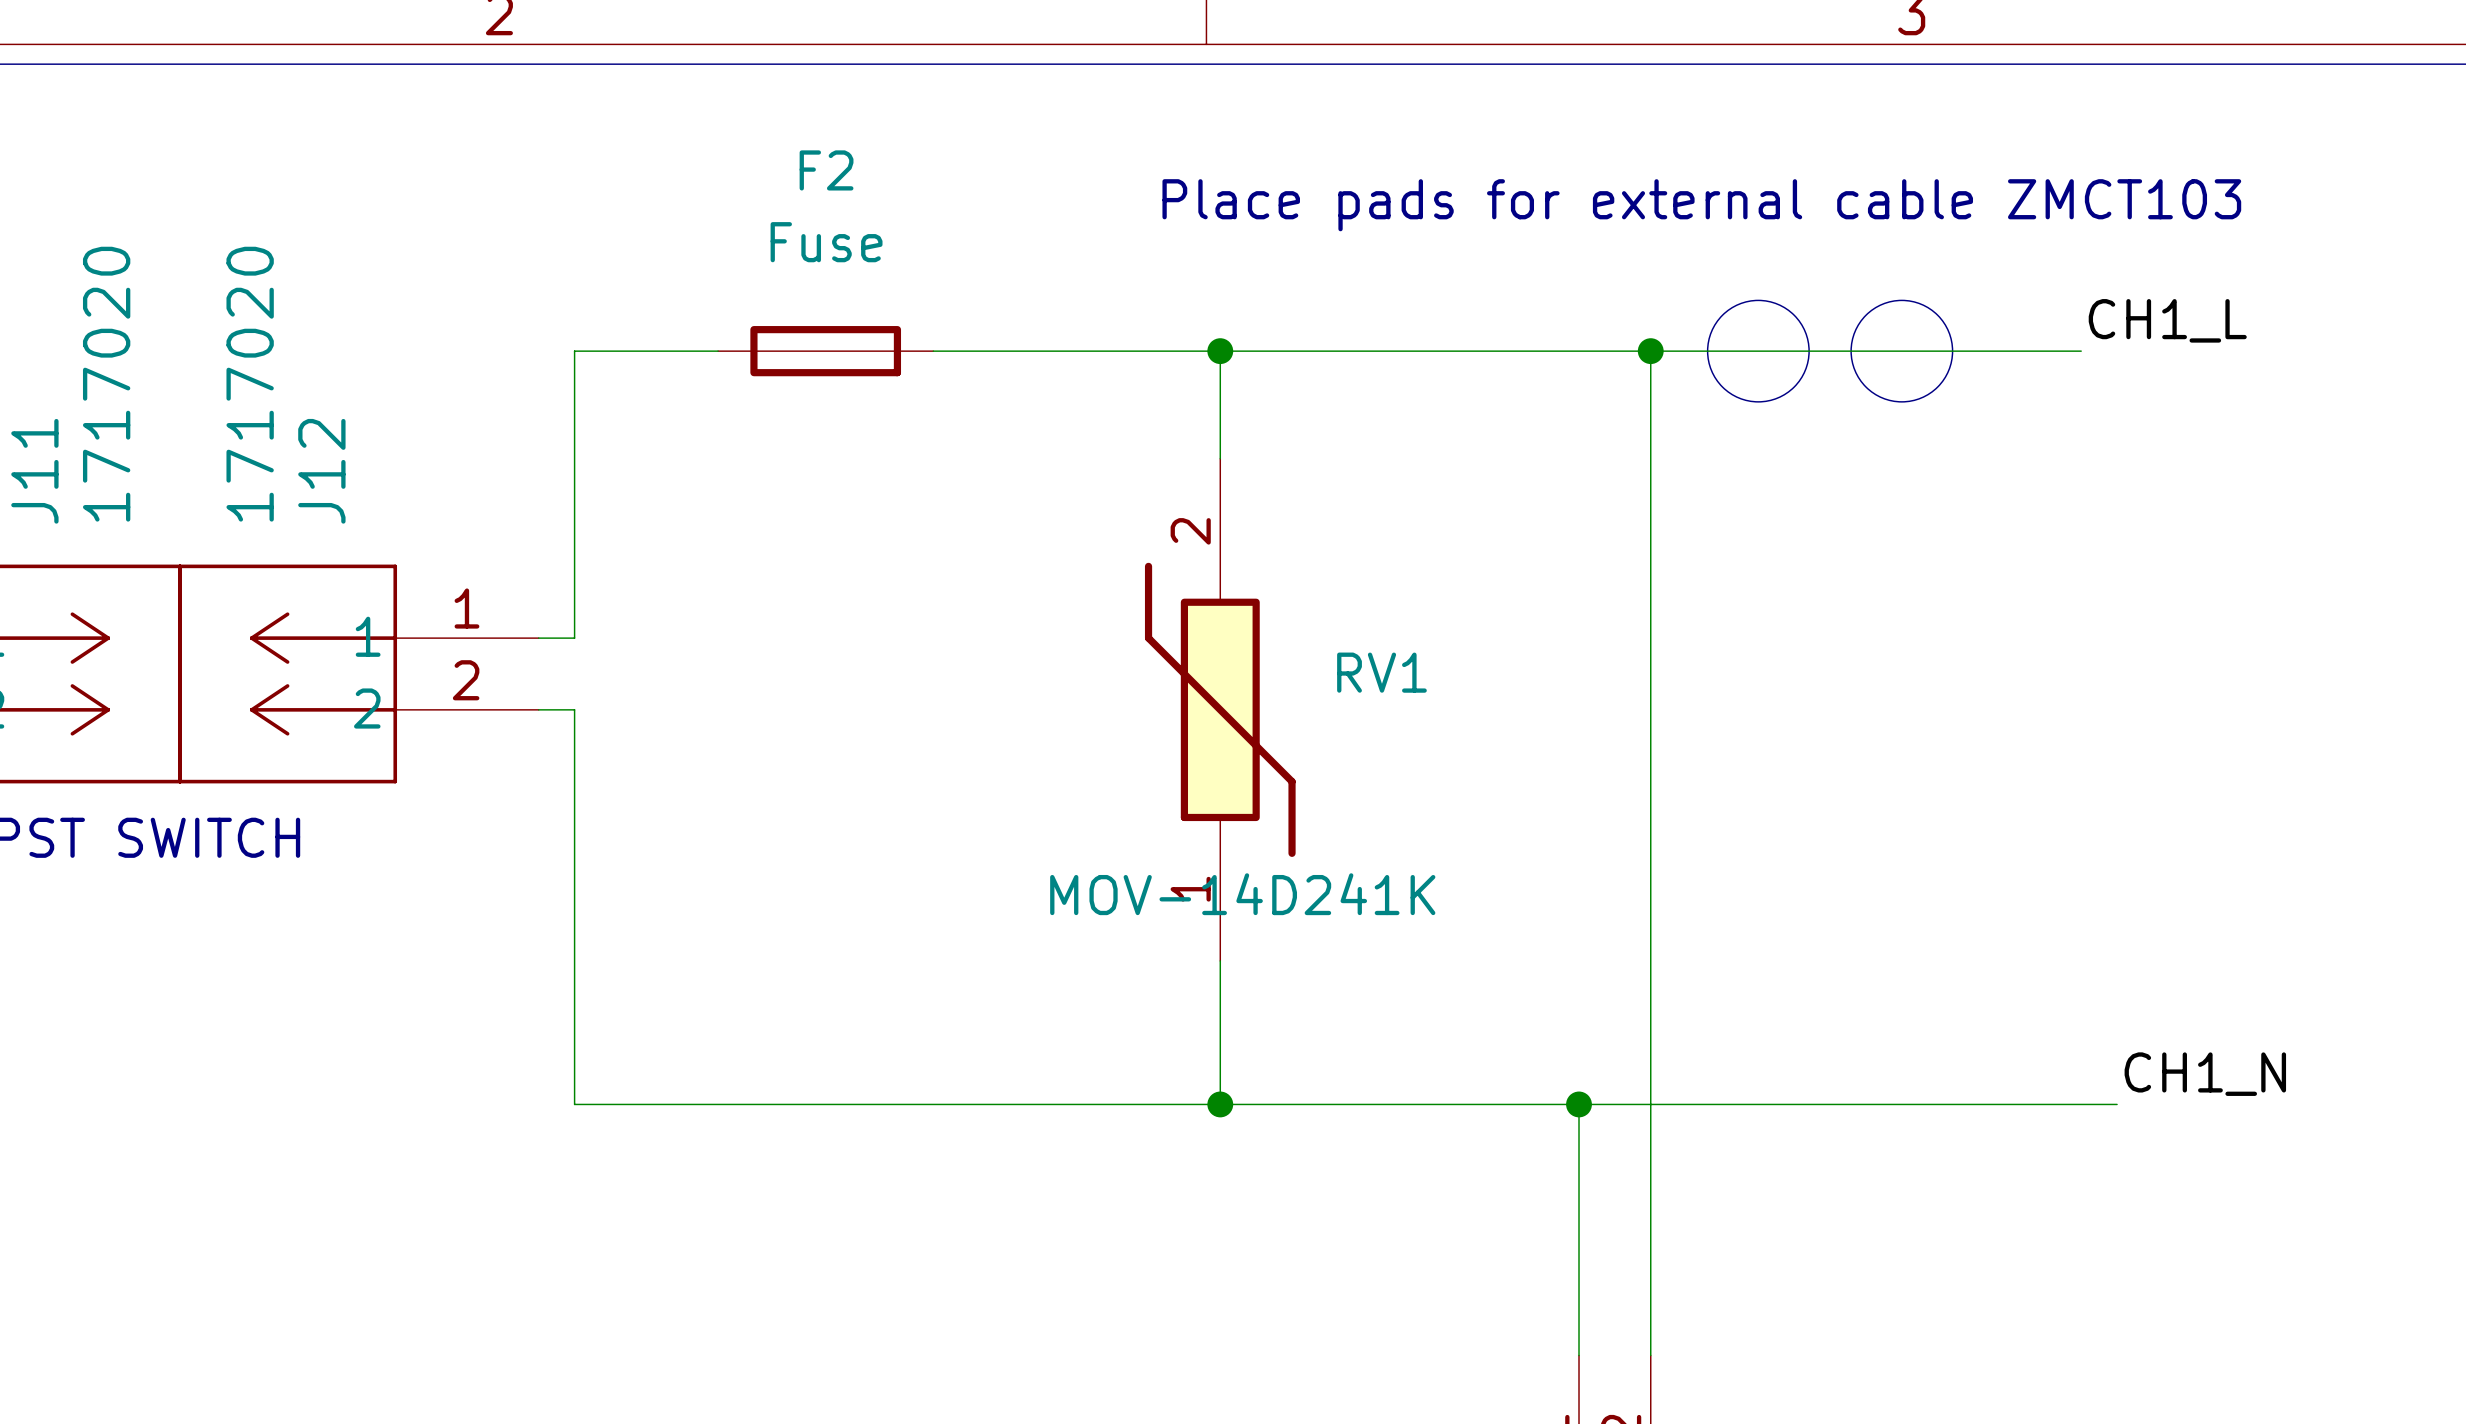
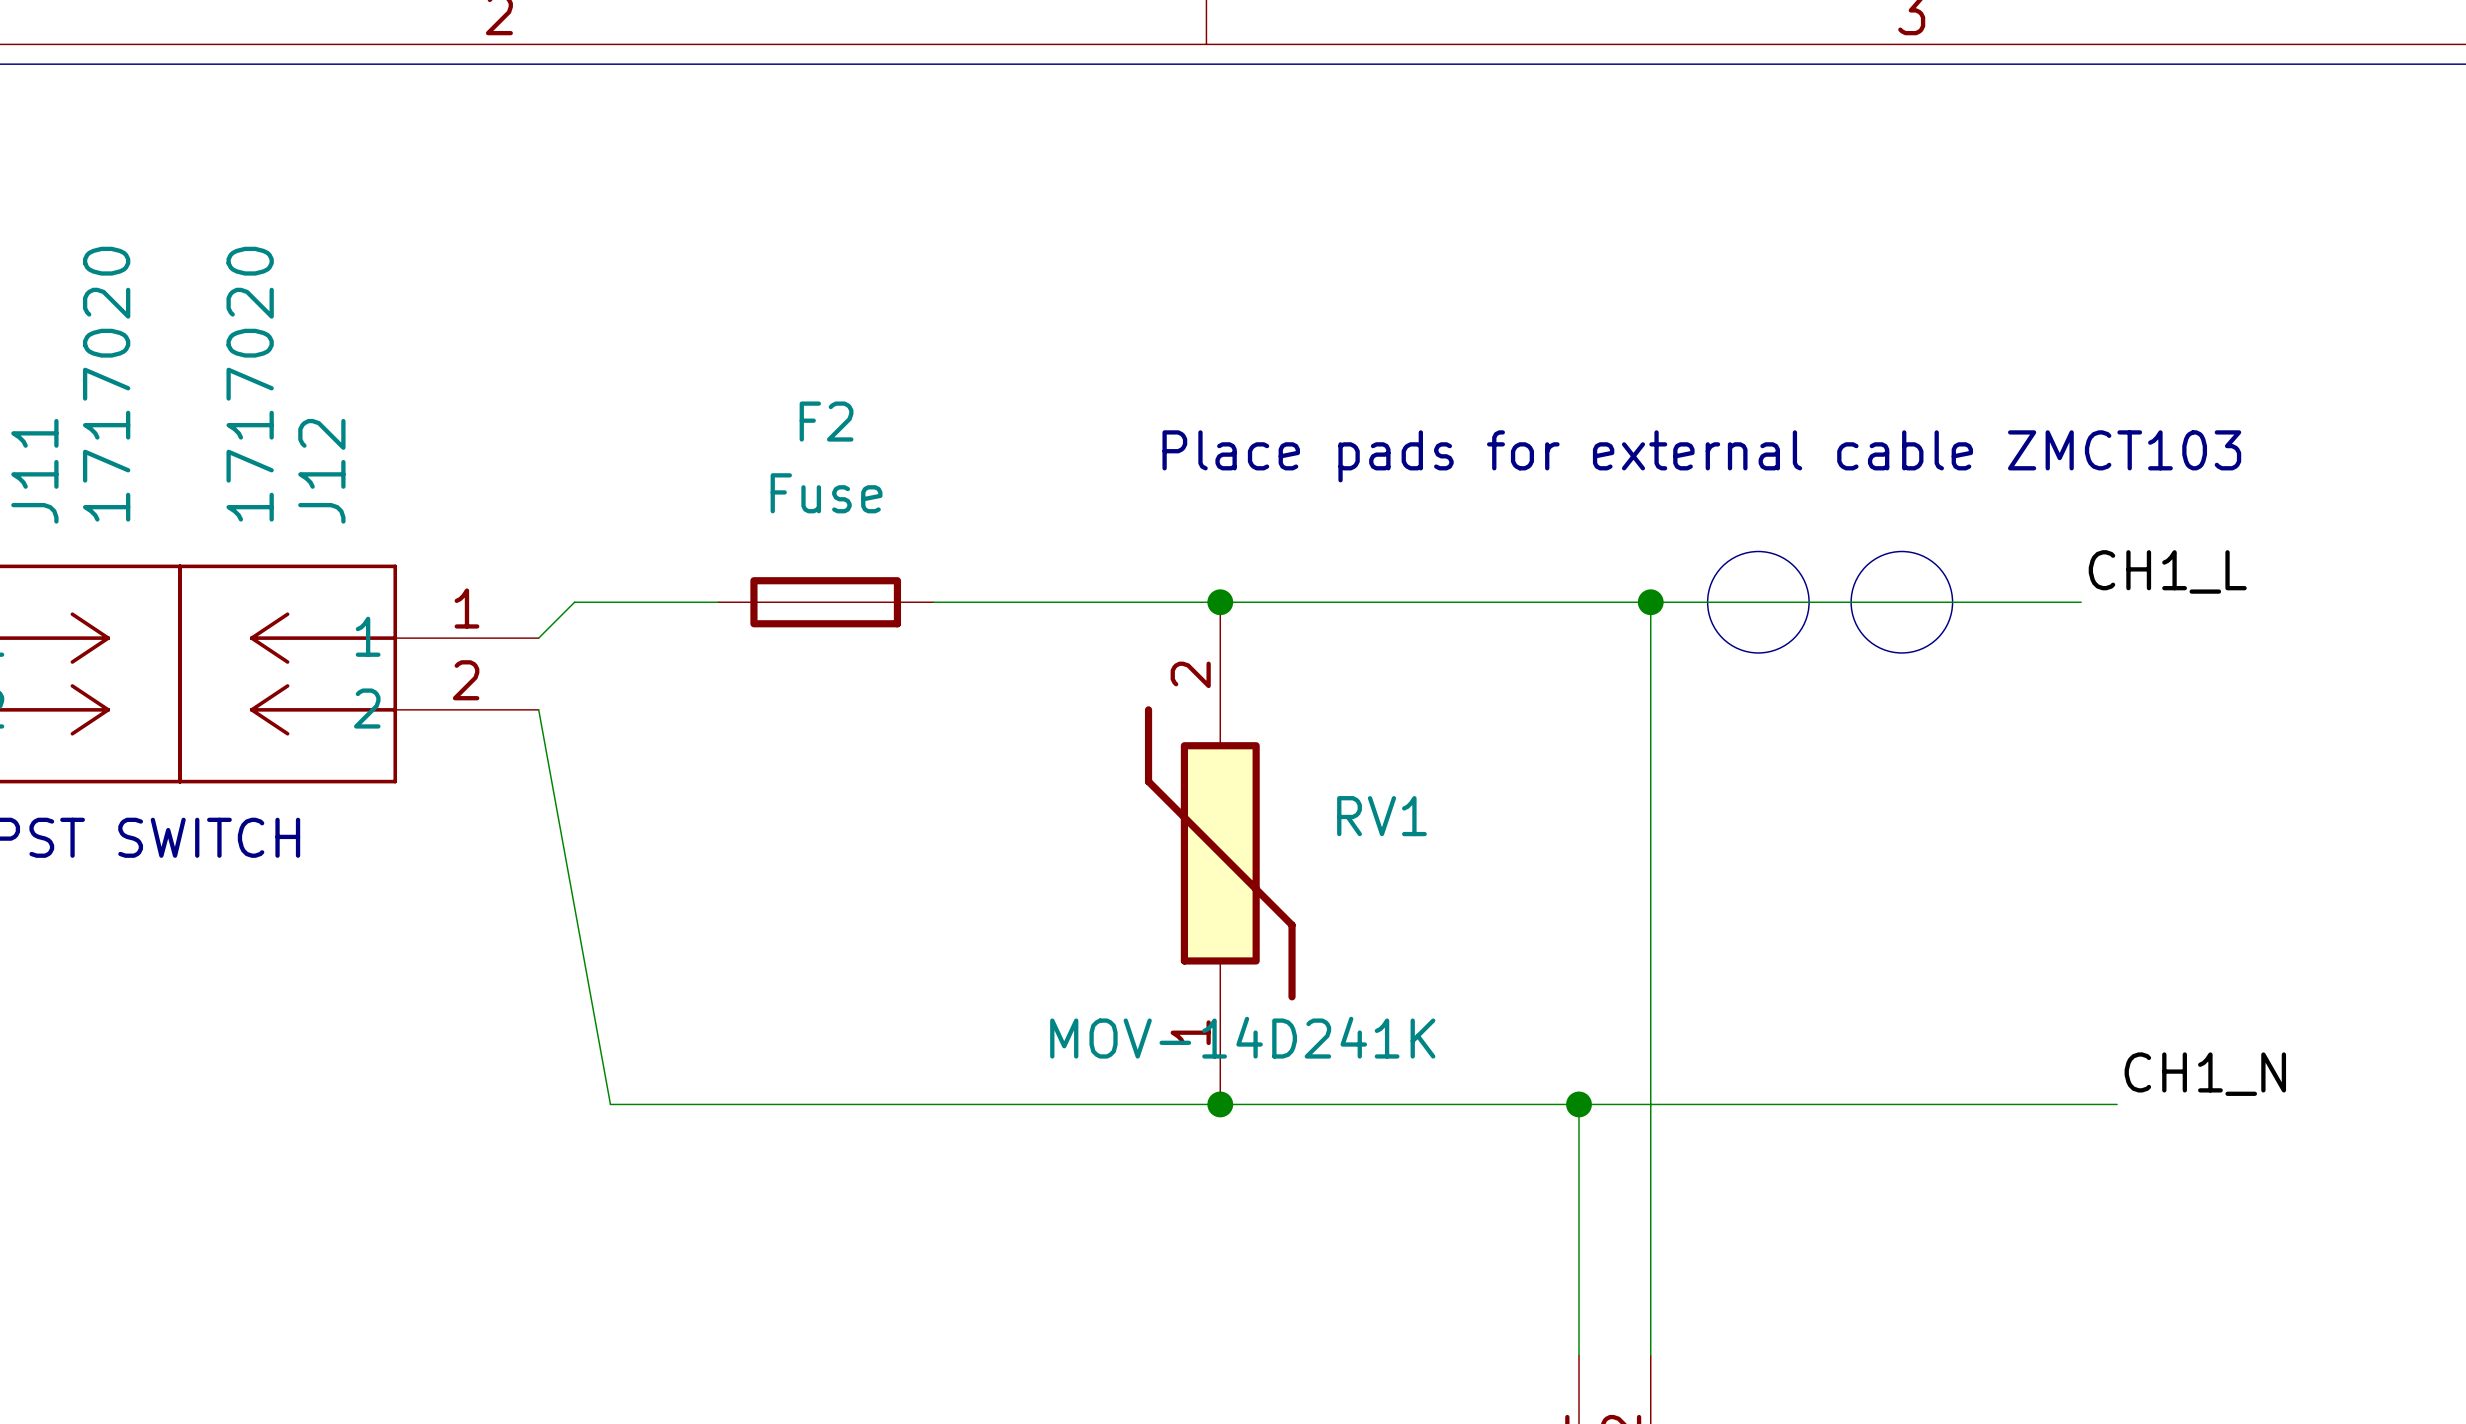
text position: Place pads for external cable ZMCT103 (1701, 205) -> Place pads for external cable ZMCT103 (1701, 456)
drawing: [1707, 300, 1810, 402] -> none
drawing: [1851, 300, 1953, 402] -> none
label position: CH1_L (2167, 320) -> CH1_L (2167, 571)
wire: (718, 351) (574, 351) (574, 638) (538, 638) -> (718, 602) (574, 602) (538, 638)
F2 position: (825, 351) -> (825, 602)
wire: (933, 351) (2081, 351) -> (933, 602) (2081, 602)
wire: (1220, 351) (1220, 458) -> none
junction: (1220, 351) -> none
wire: (1650, 351) (1650, 602) -> none
junction: (1650, 351) -> none
drawing: none -> [1707, 551, 1810, 653]
drawing: none -> [1851, 551, 1953, 653]
junction: none -> (1220, 602)
junction: none -> (1650, 602)
wire: (538, 709) (574, 709) (574, 1104) (610, 1104) -> (538, 709) (610, 1104)
RV1 position: (1220, 709) -> (1220, 853)

